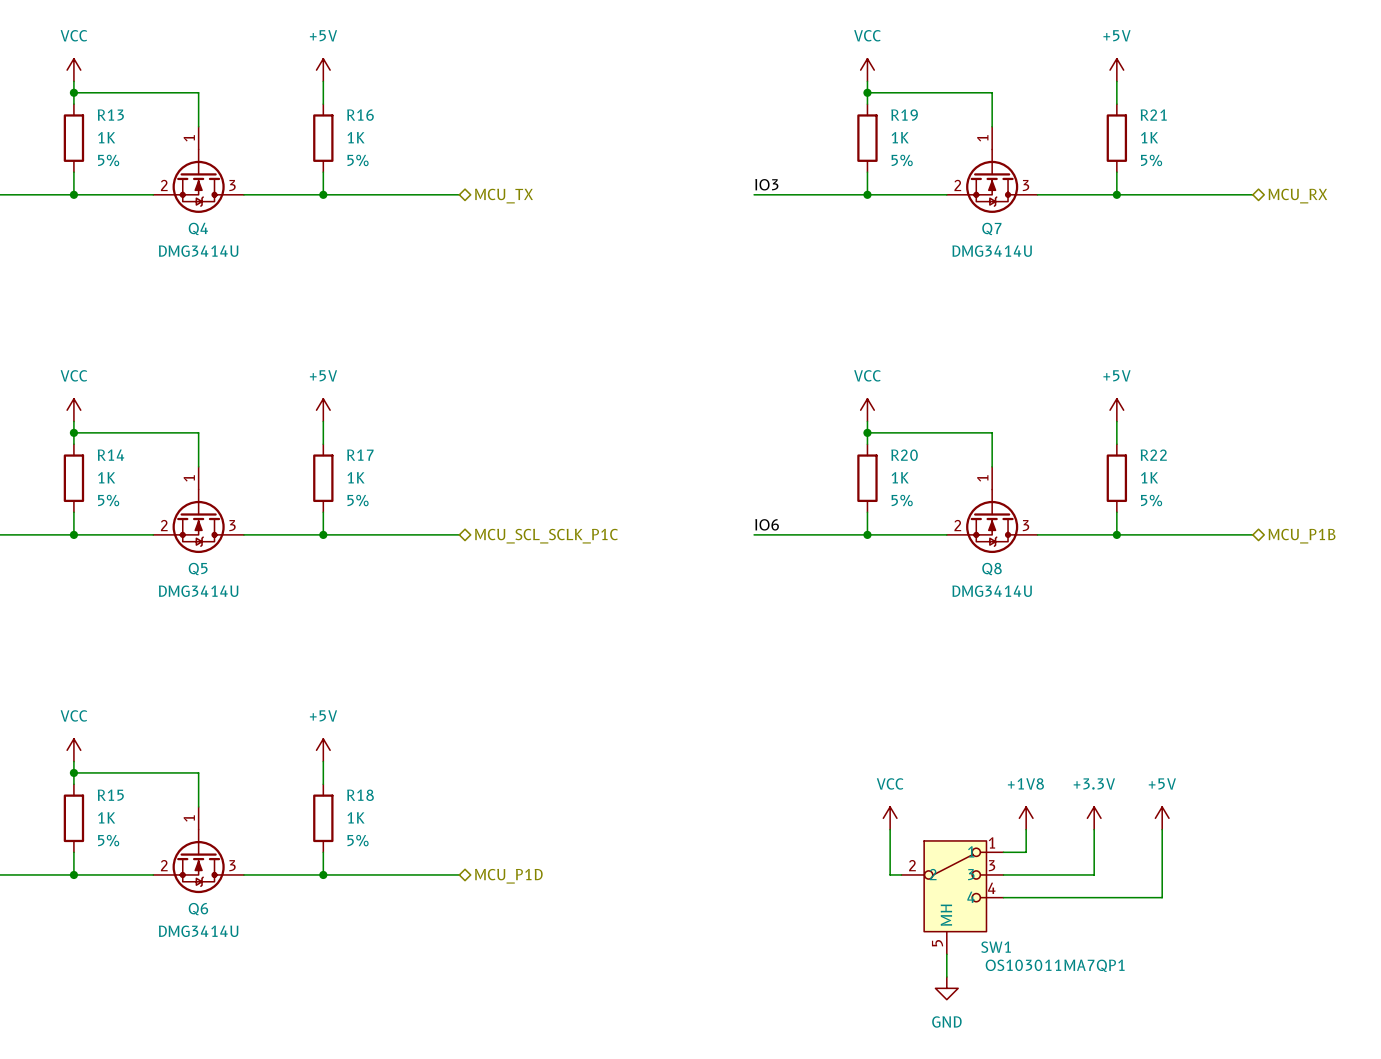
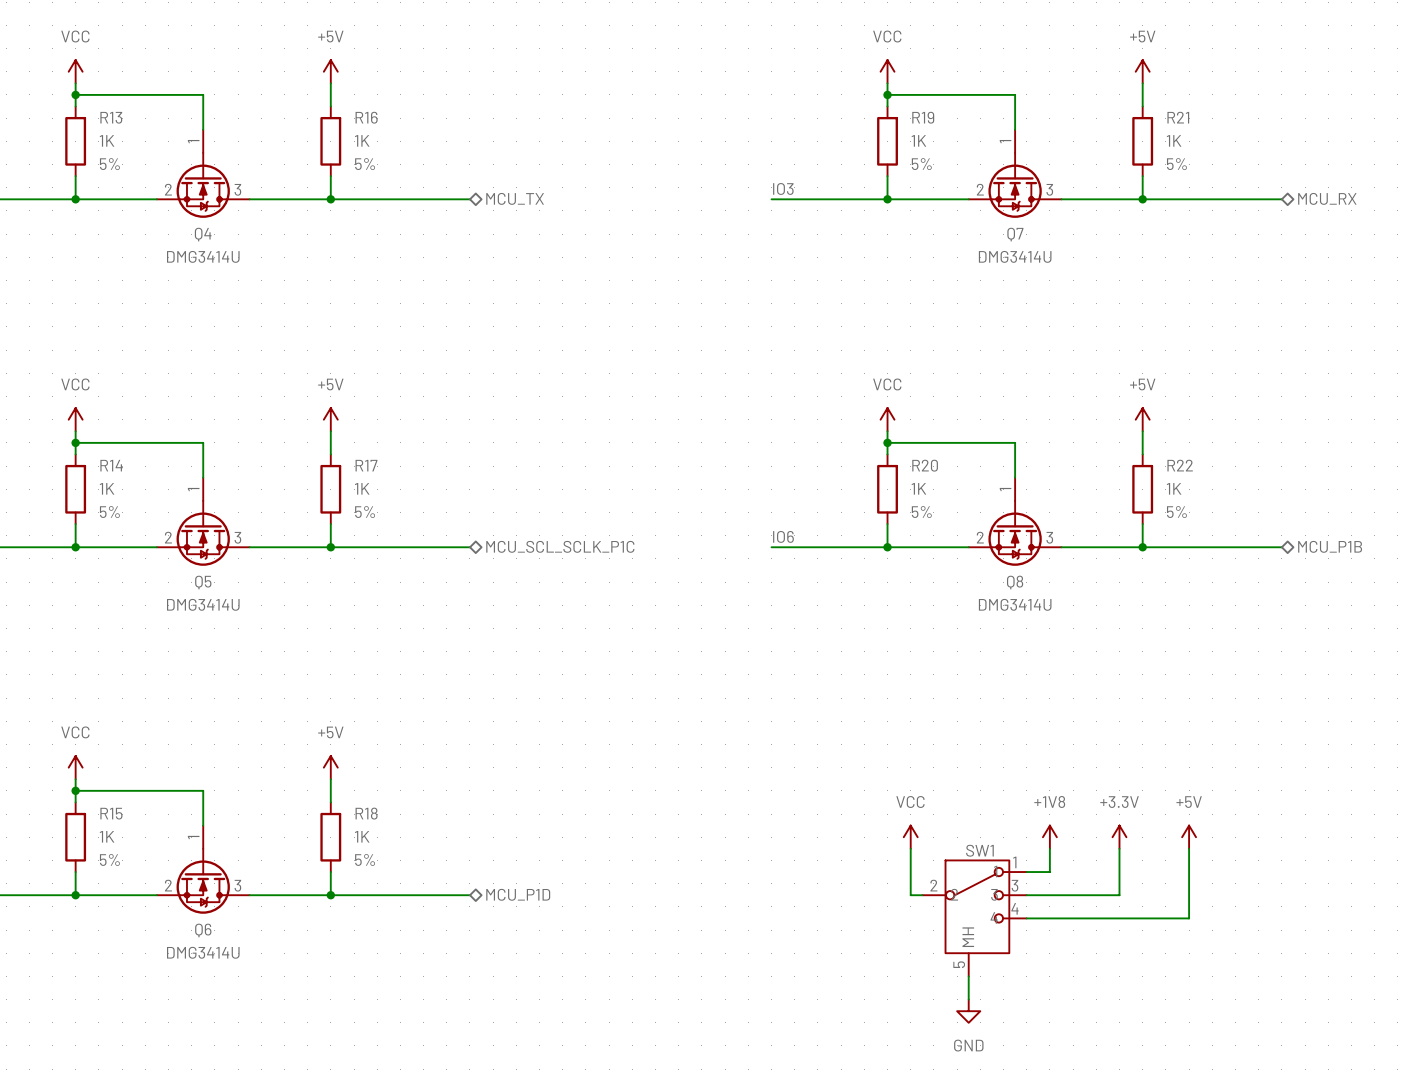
SW1 name position: SW1 (996, 947) -> SW1 (979, 850)
SW1 value: OS103011MA7QP1 (1055, 965) -> none

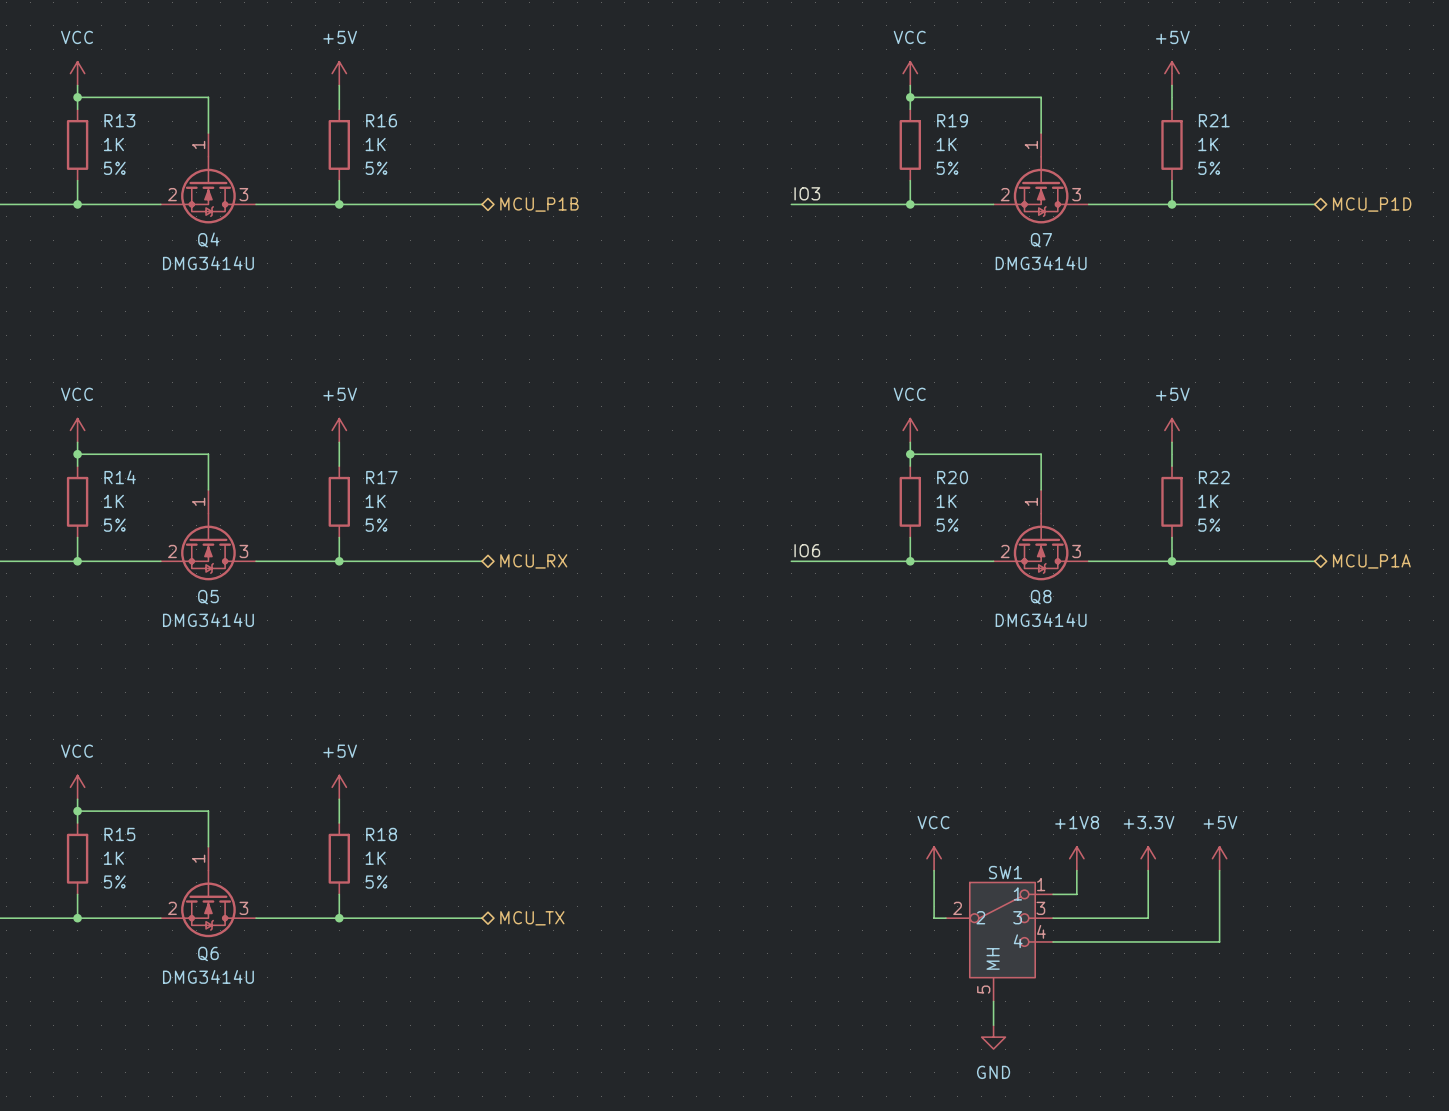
hierarchical label: MCU_TX (515, 198) -> MCU_P1B (539, 204)
hierarchical label: MCU_RX (1327, 198) -> MCU_P1D (1372, 204)
hierarchical label: MCU_SCL_SCLK_P1C (560, 546) -> MCU_RX (533, 561)
hierarchical label: MCU_P1B (1330, 546) -> MCU_P1A (1371, 561)
hierarchical label: MCU_P1D (518, 894) -> MCU_TX (532, 918)

